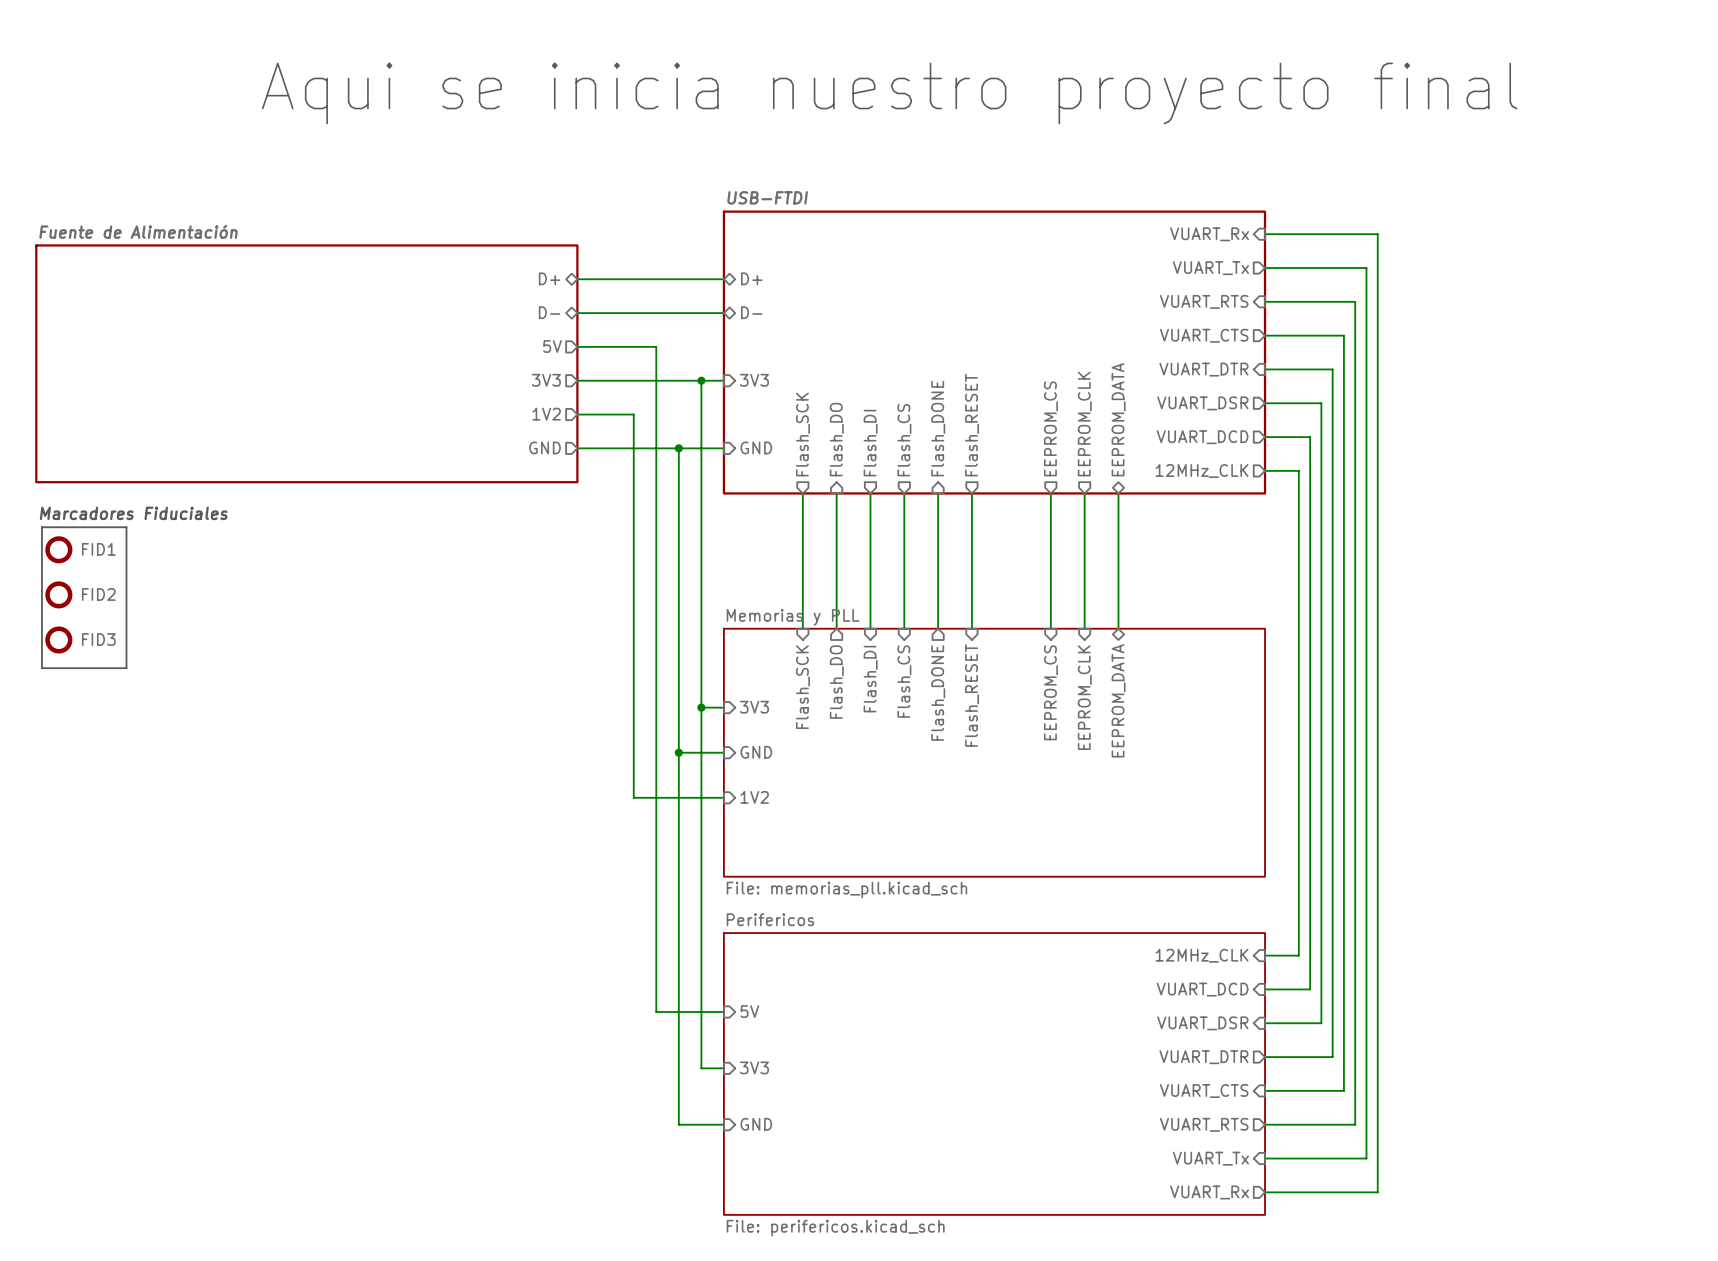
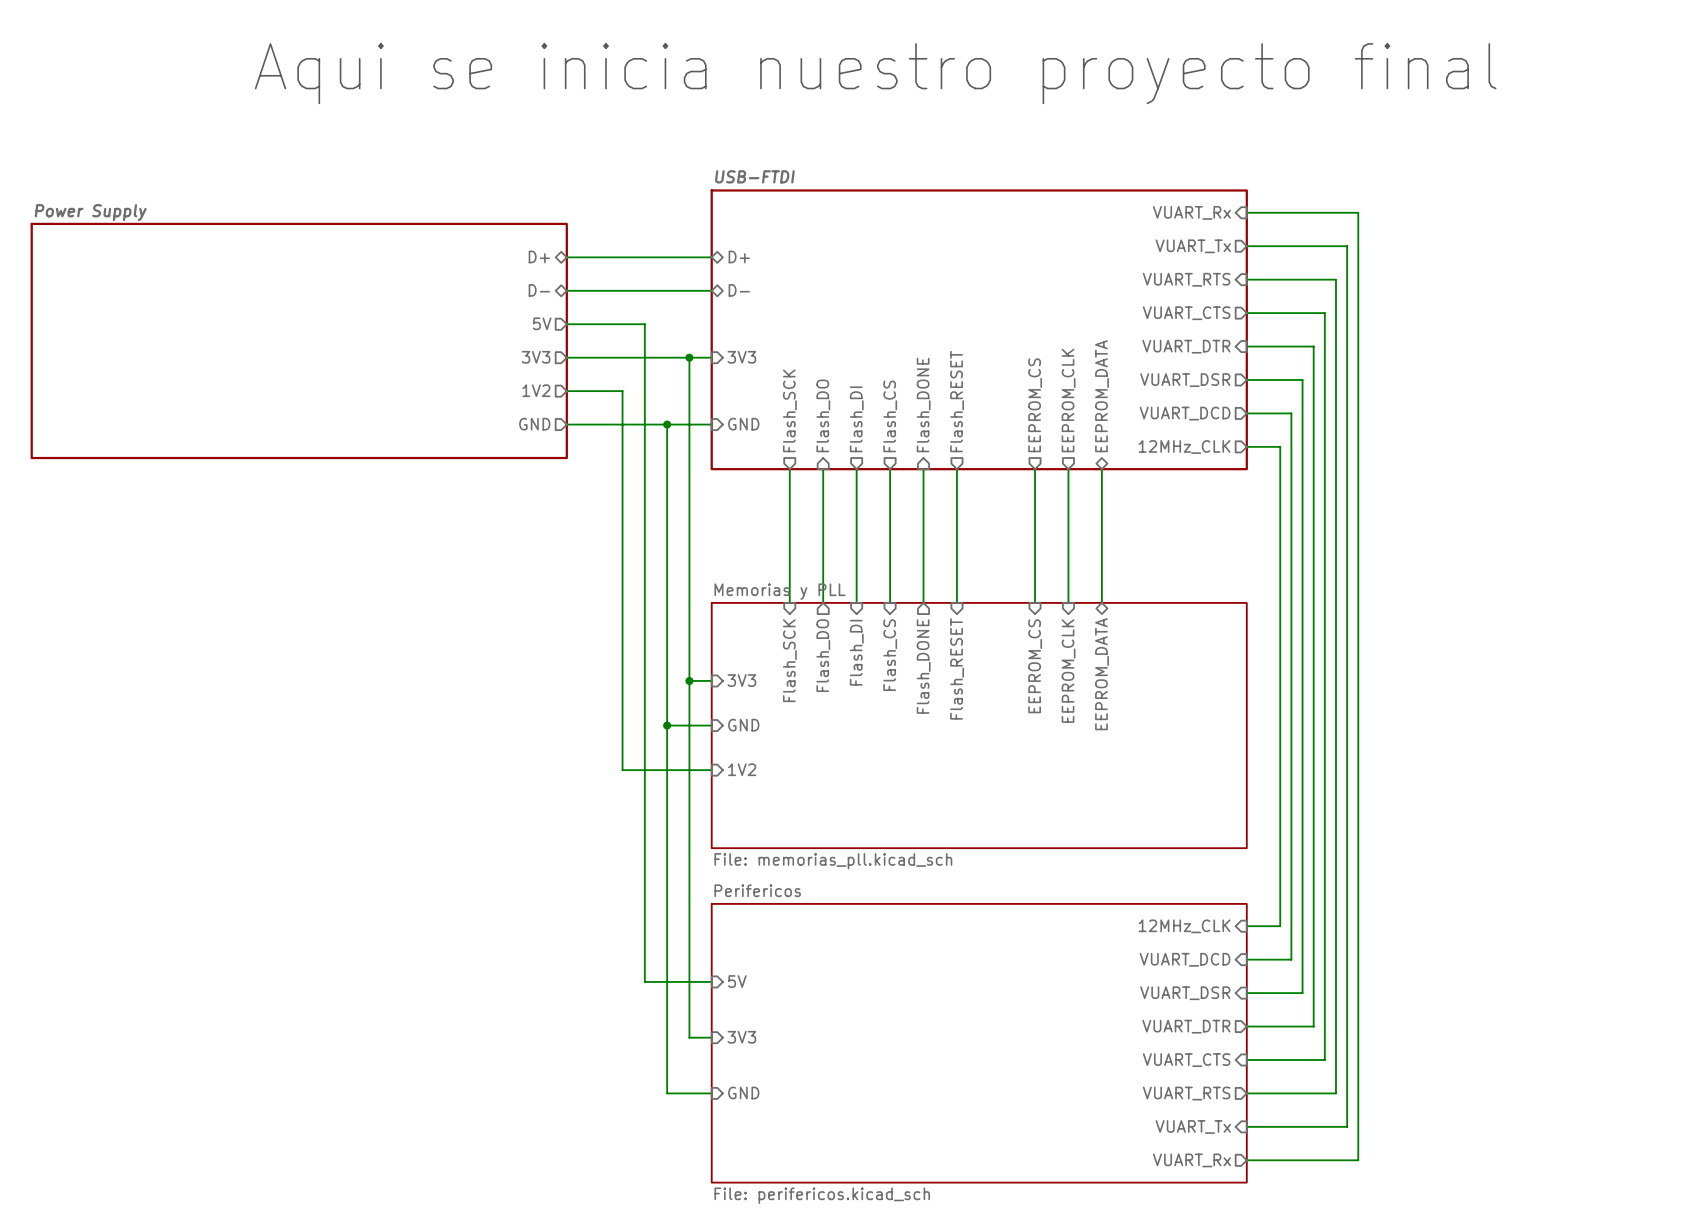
sheet Fuente de Alimentación name: Fuente de Alimentación (138, 231) -> Power Supply (90, 212)
text: Marcadores Fiduciales (133, 513) -> none
line: (41, 527) (126, 527) (126, 668) (41, 668) (41, 527) -> none
FID1: (58, 549) -> none
FID2: (58, 594) -> none
FID3: (58, 639) -> none

